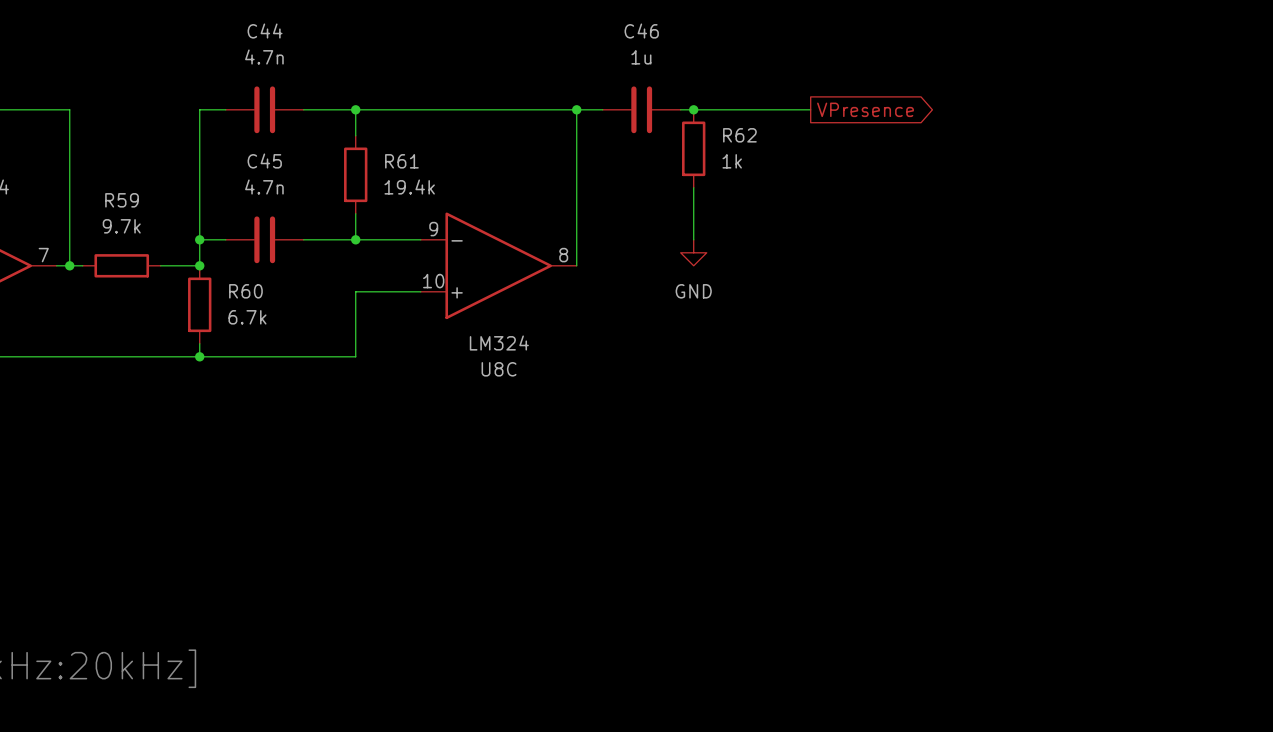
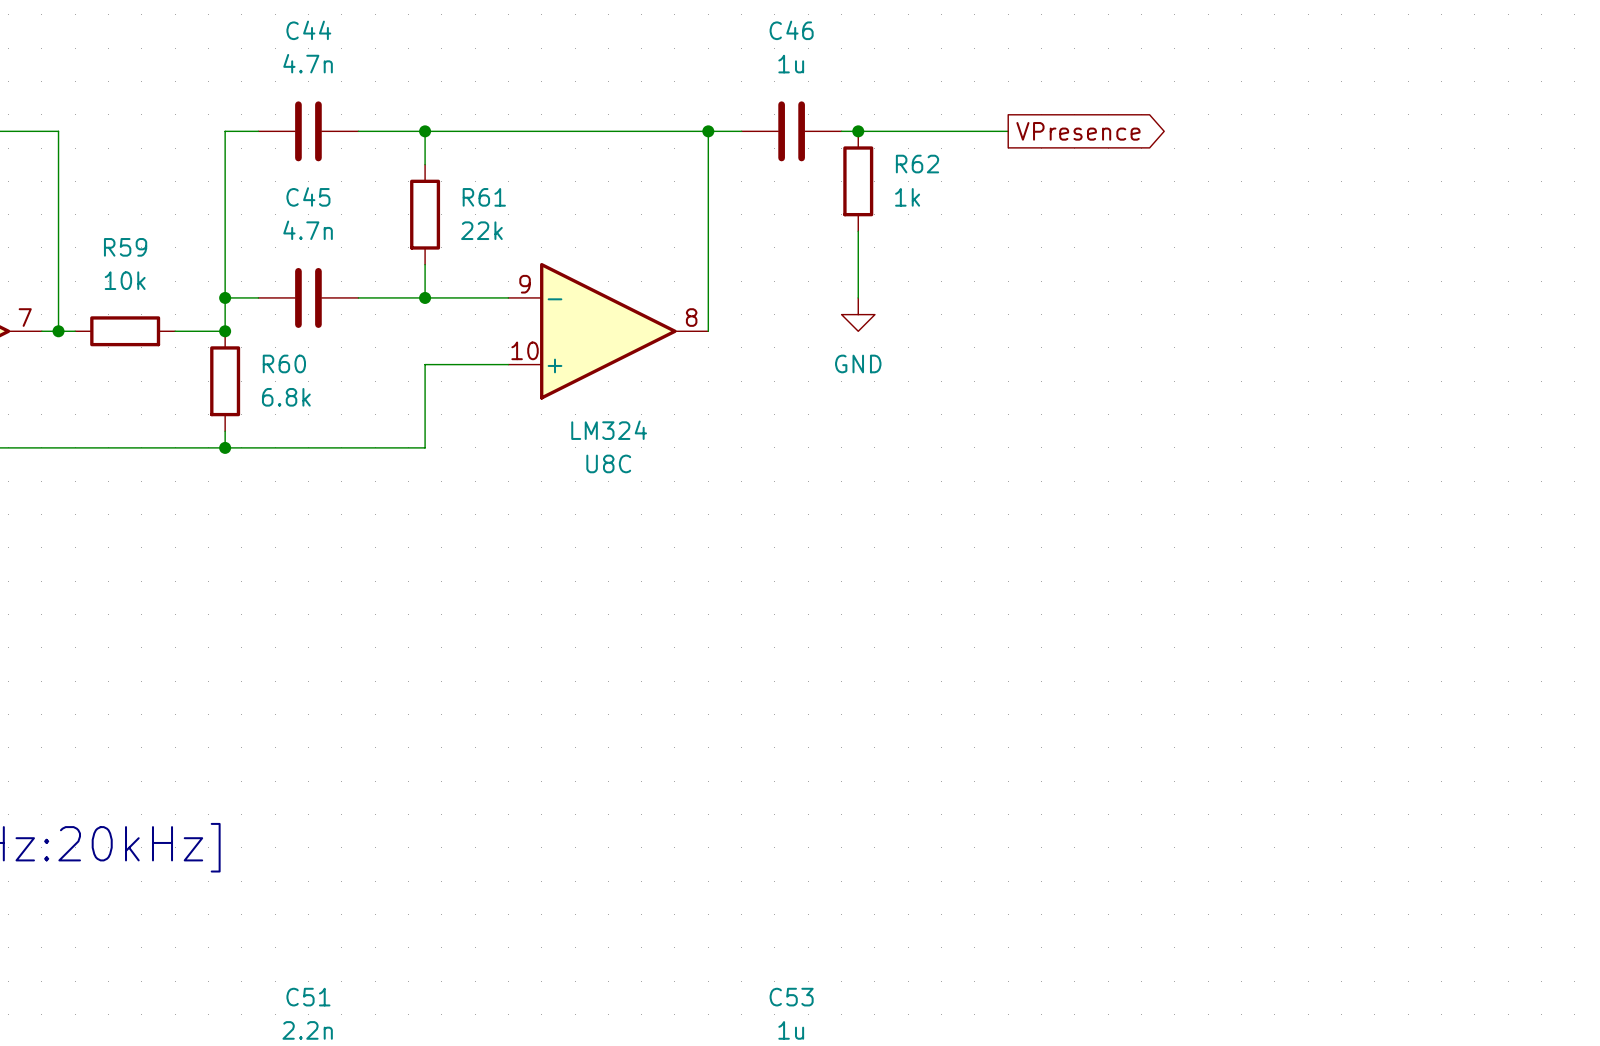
R61 value: 19.4k (409, 187) -> 22k (481, 230)
R59 value: 9.7k (121, 226) -> 10k (125, 280)
R60 value: 6.7k (247, 317) -> 6.8k (286, 397)

